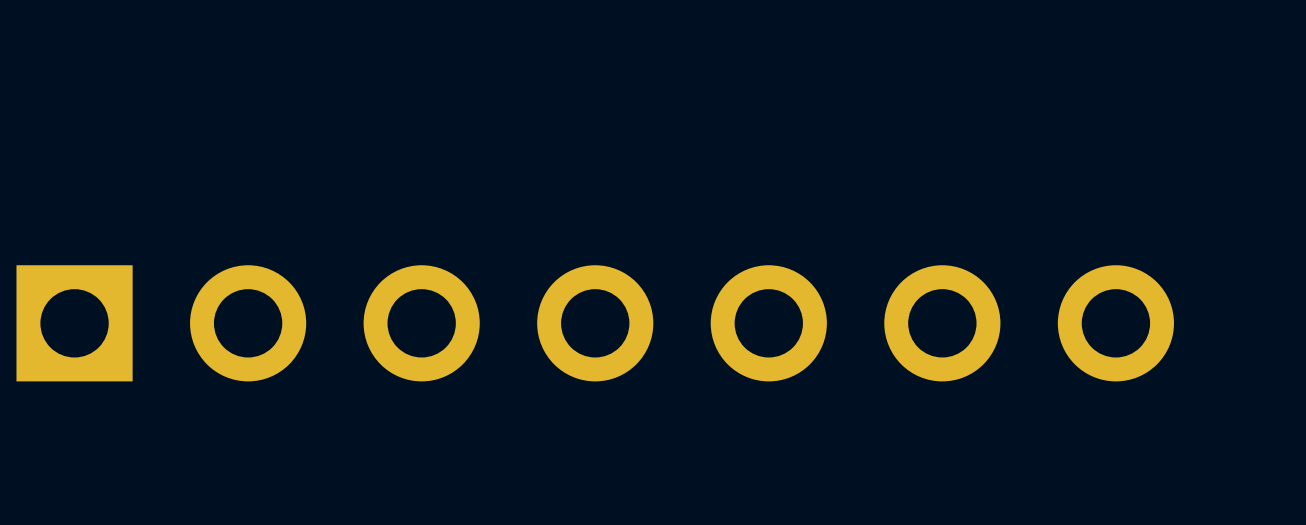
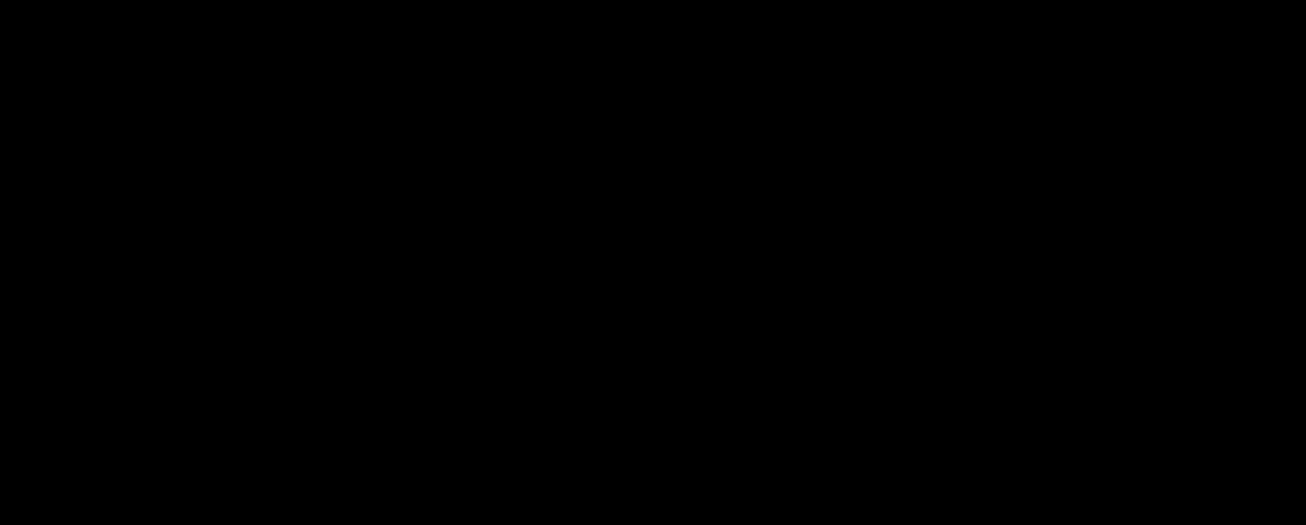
part: (595, 323) -> none

